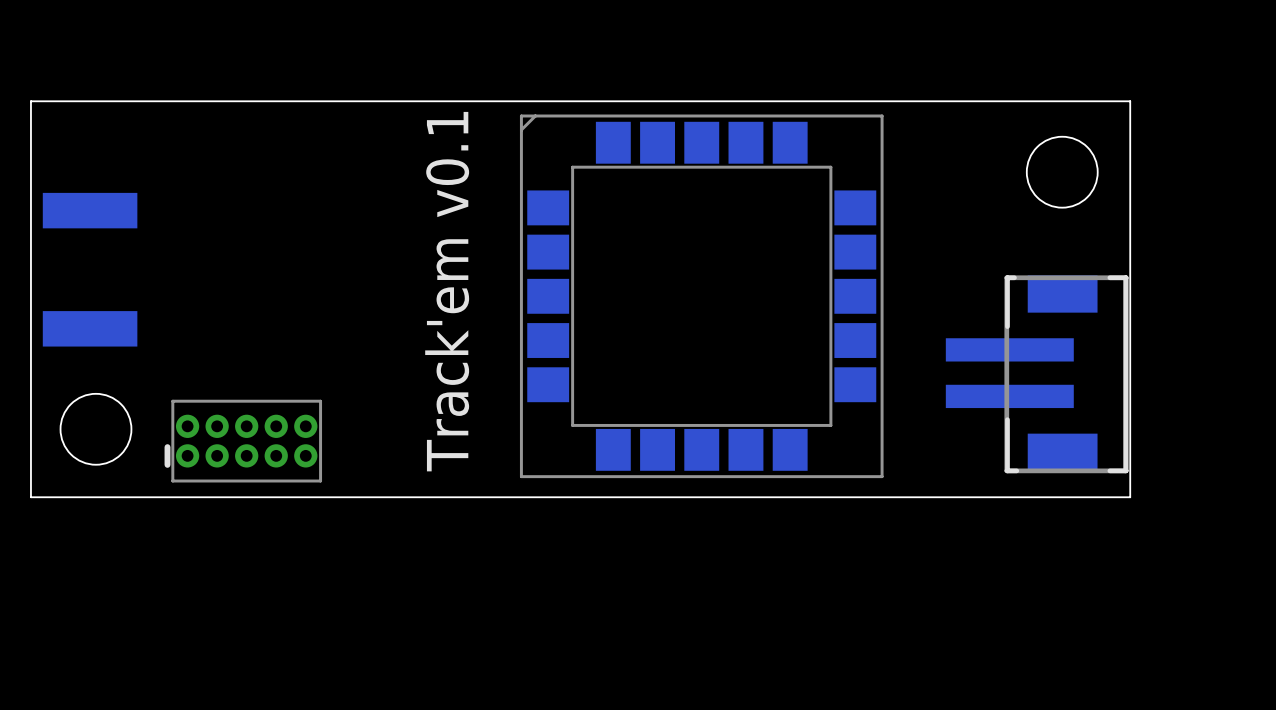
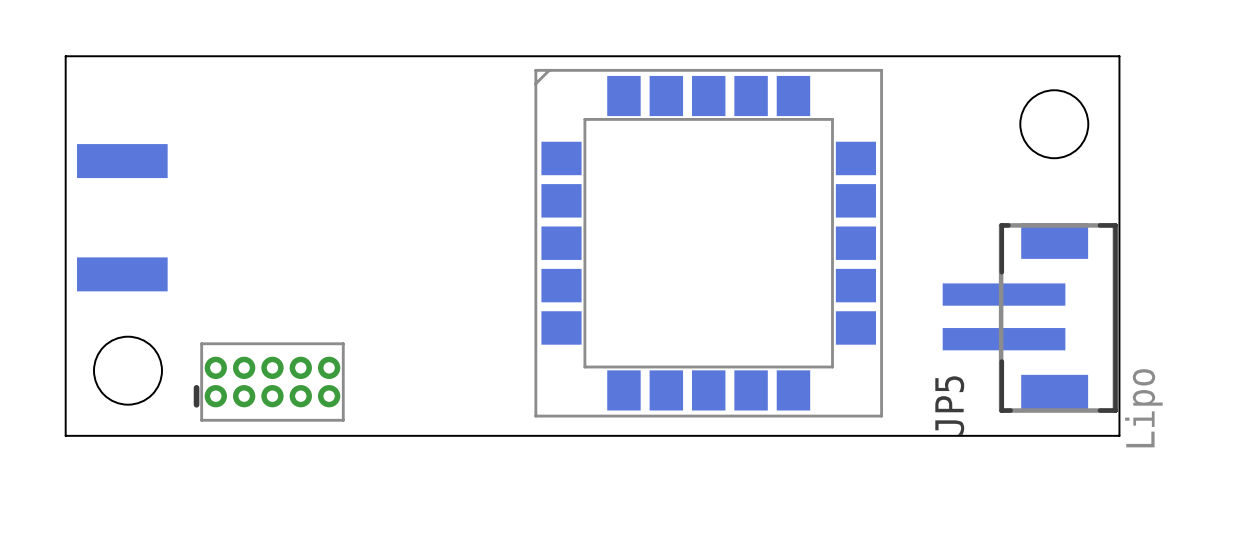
text: Track'em v0.1 (447, 291) -> none
JP5 name: none -> JP5 (949, 405)
JP5 value: none -> Lipo (1143, 408)

